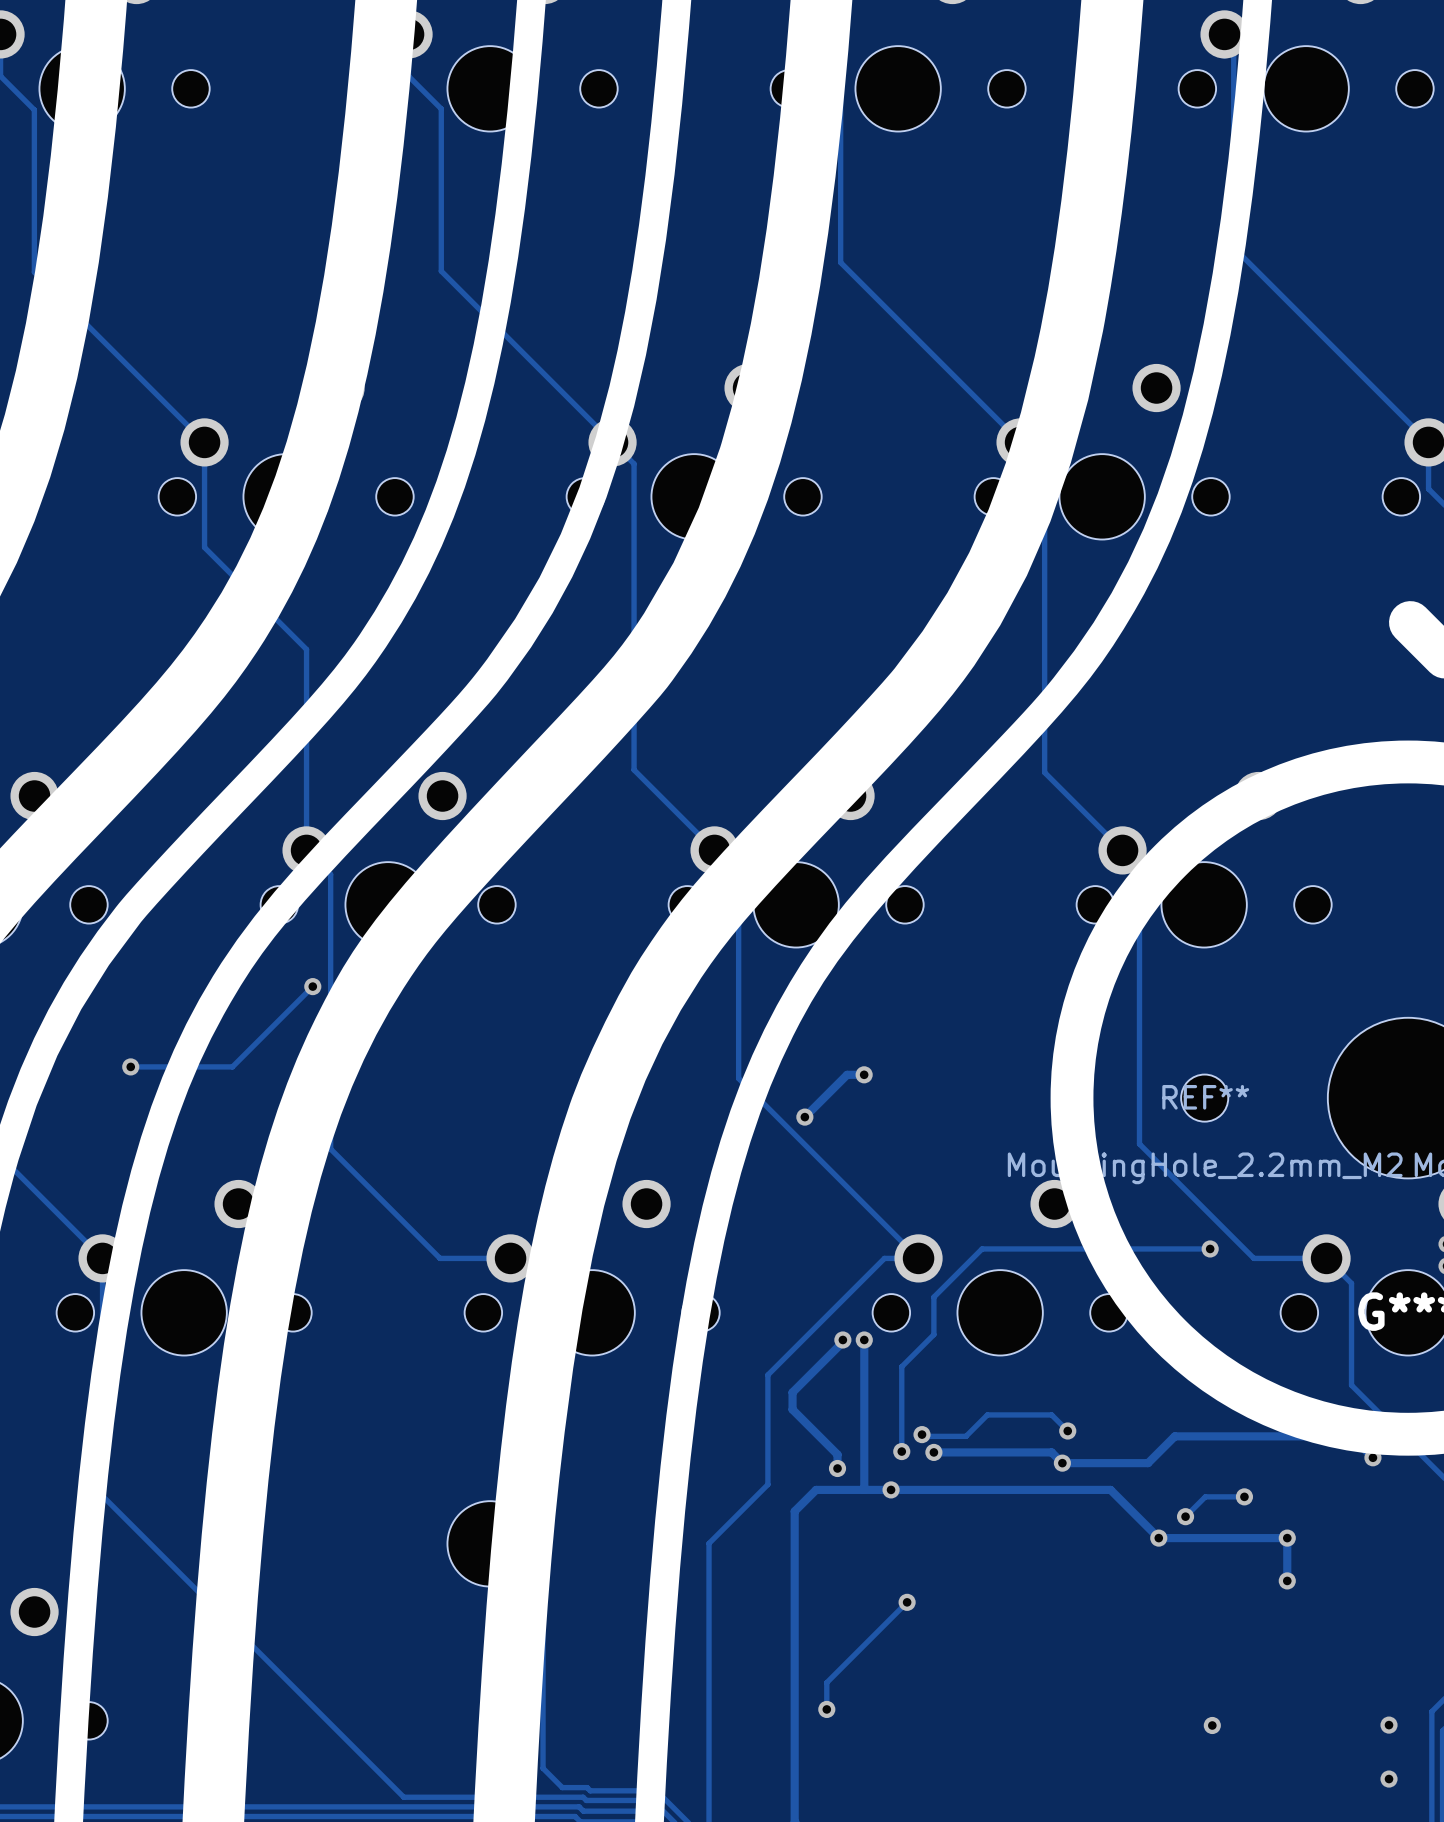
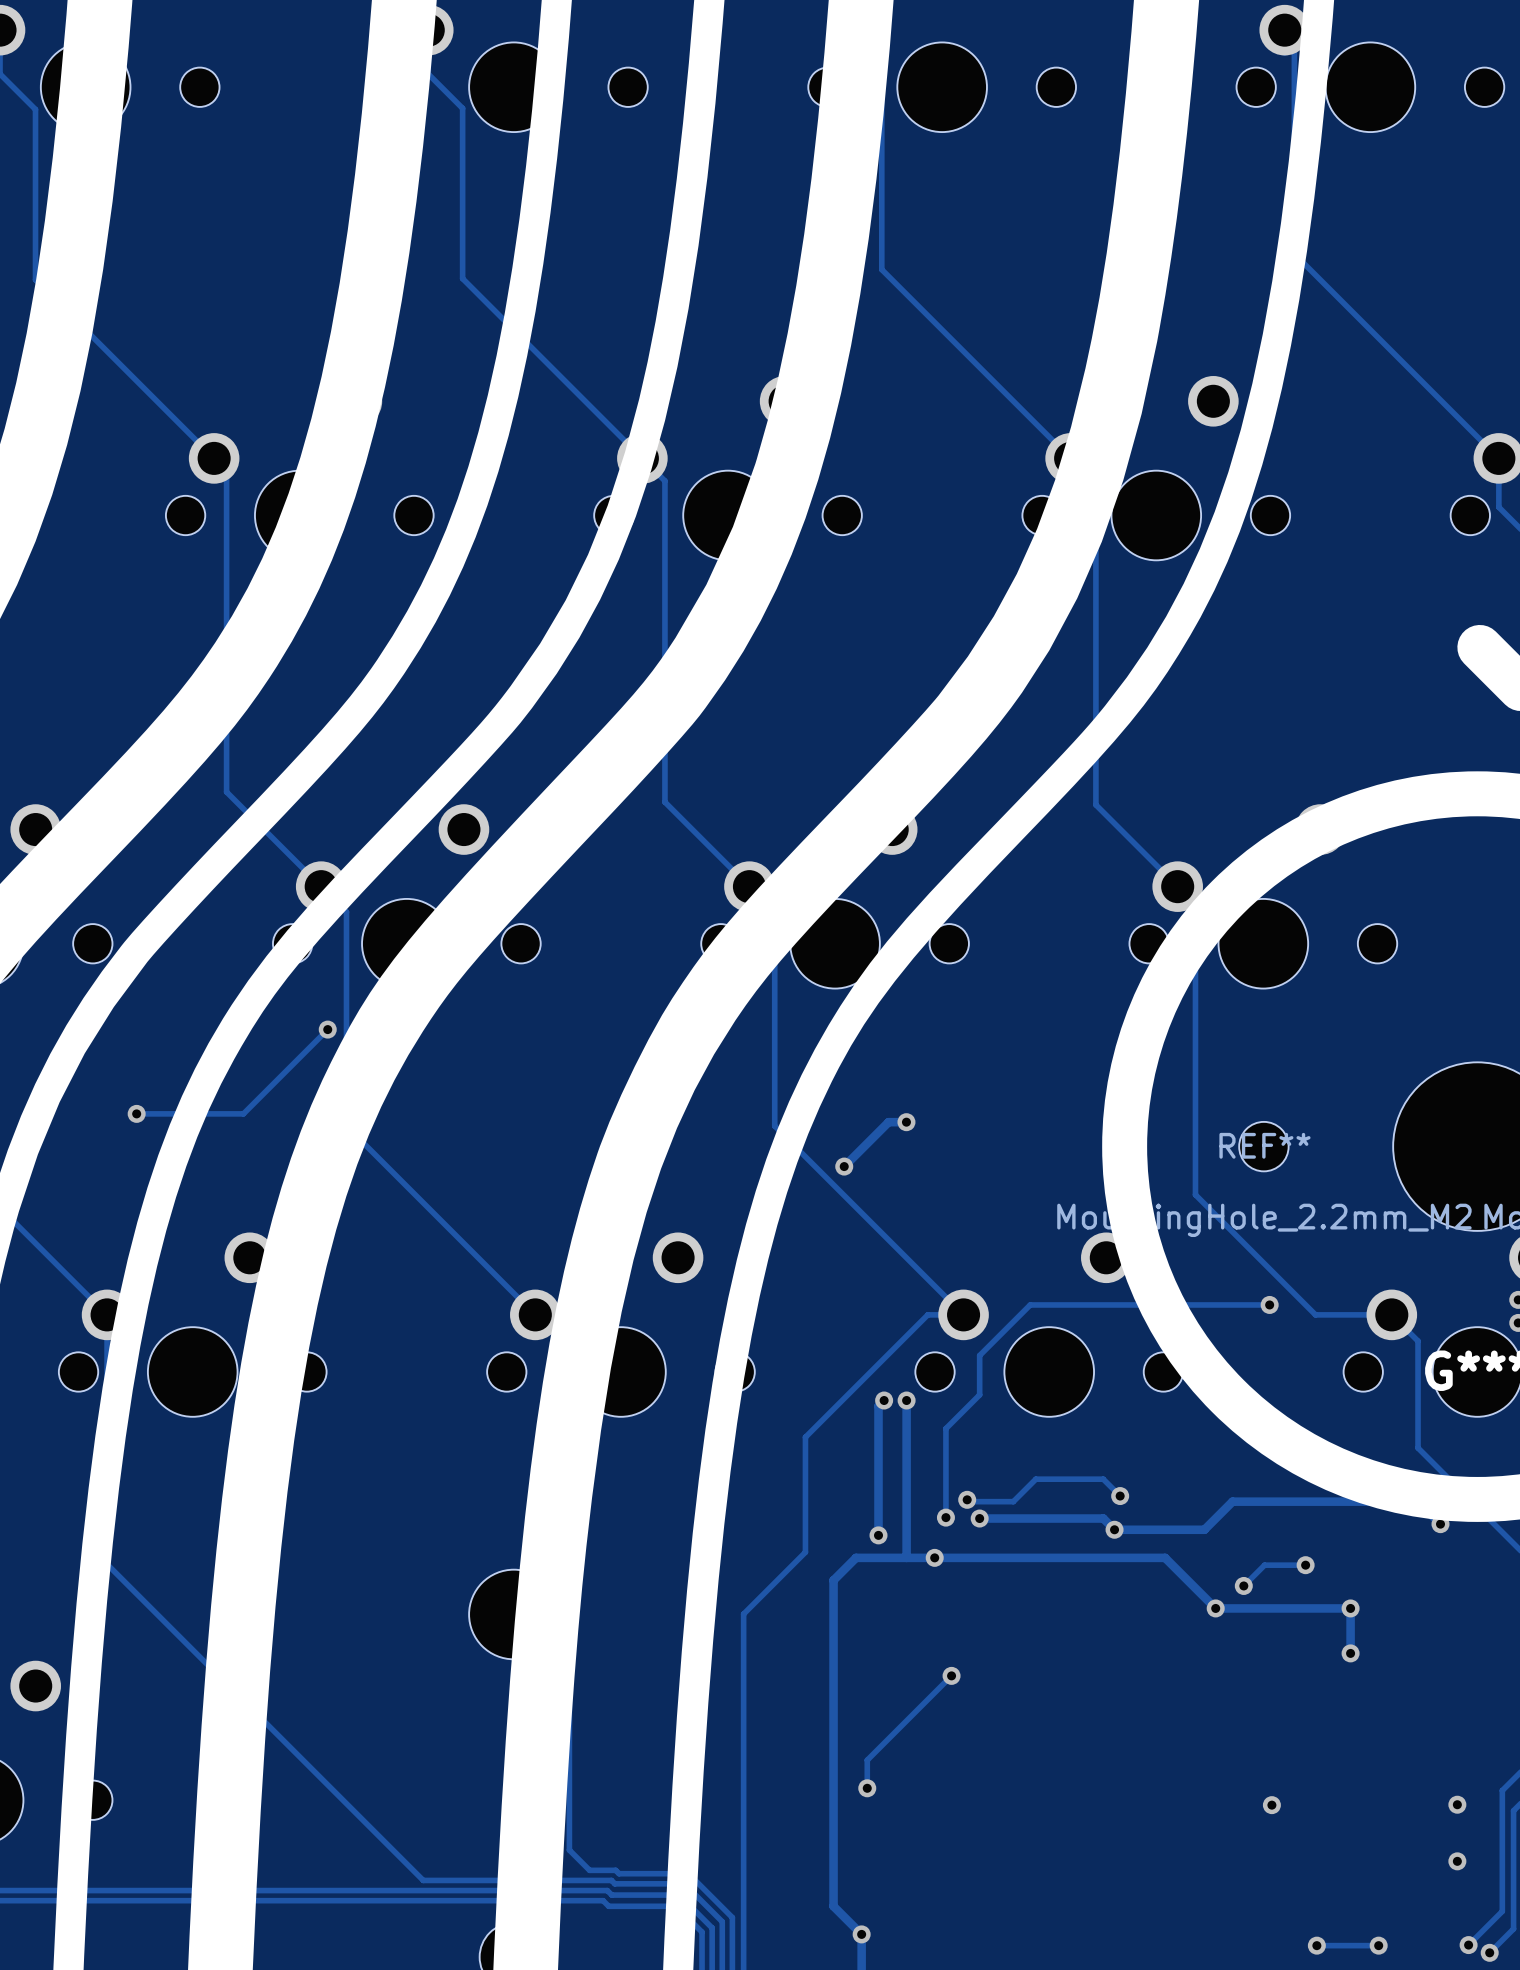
track: (204, 442) (204, 547) (306, 649) (306, 850) -> (214, 458) (226, 470) (226, 792) (321, 886)
track: (330, 1078) (330, 1149) (440, 1258) (510, 1258) -> (346, 1126) (535, 1314)
track: (842, 1339) (792, 1392) (792, 1409) (837, 1454) -> (884, 1400) (878, 1406) (878, 1520)

